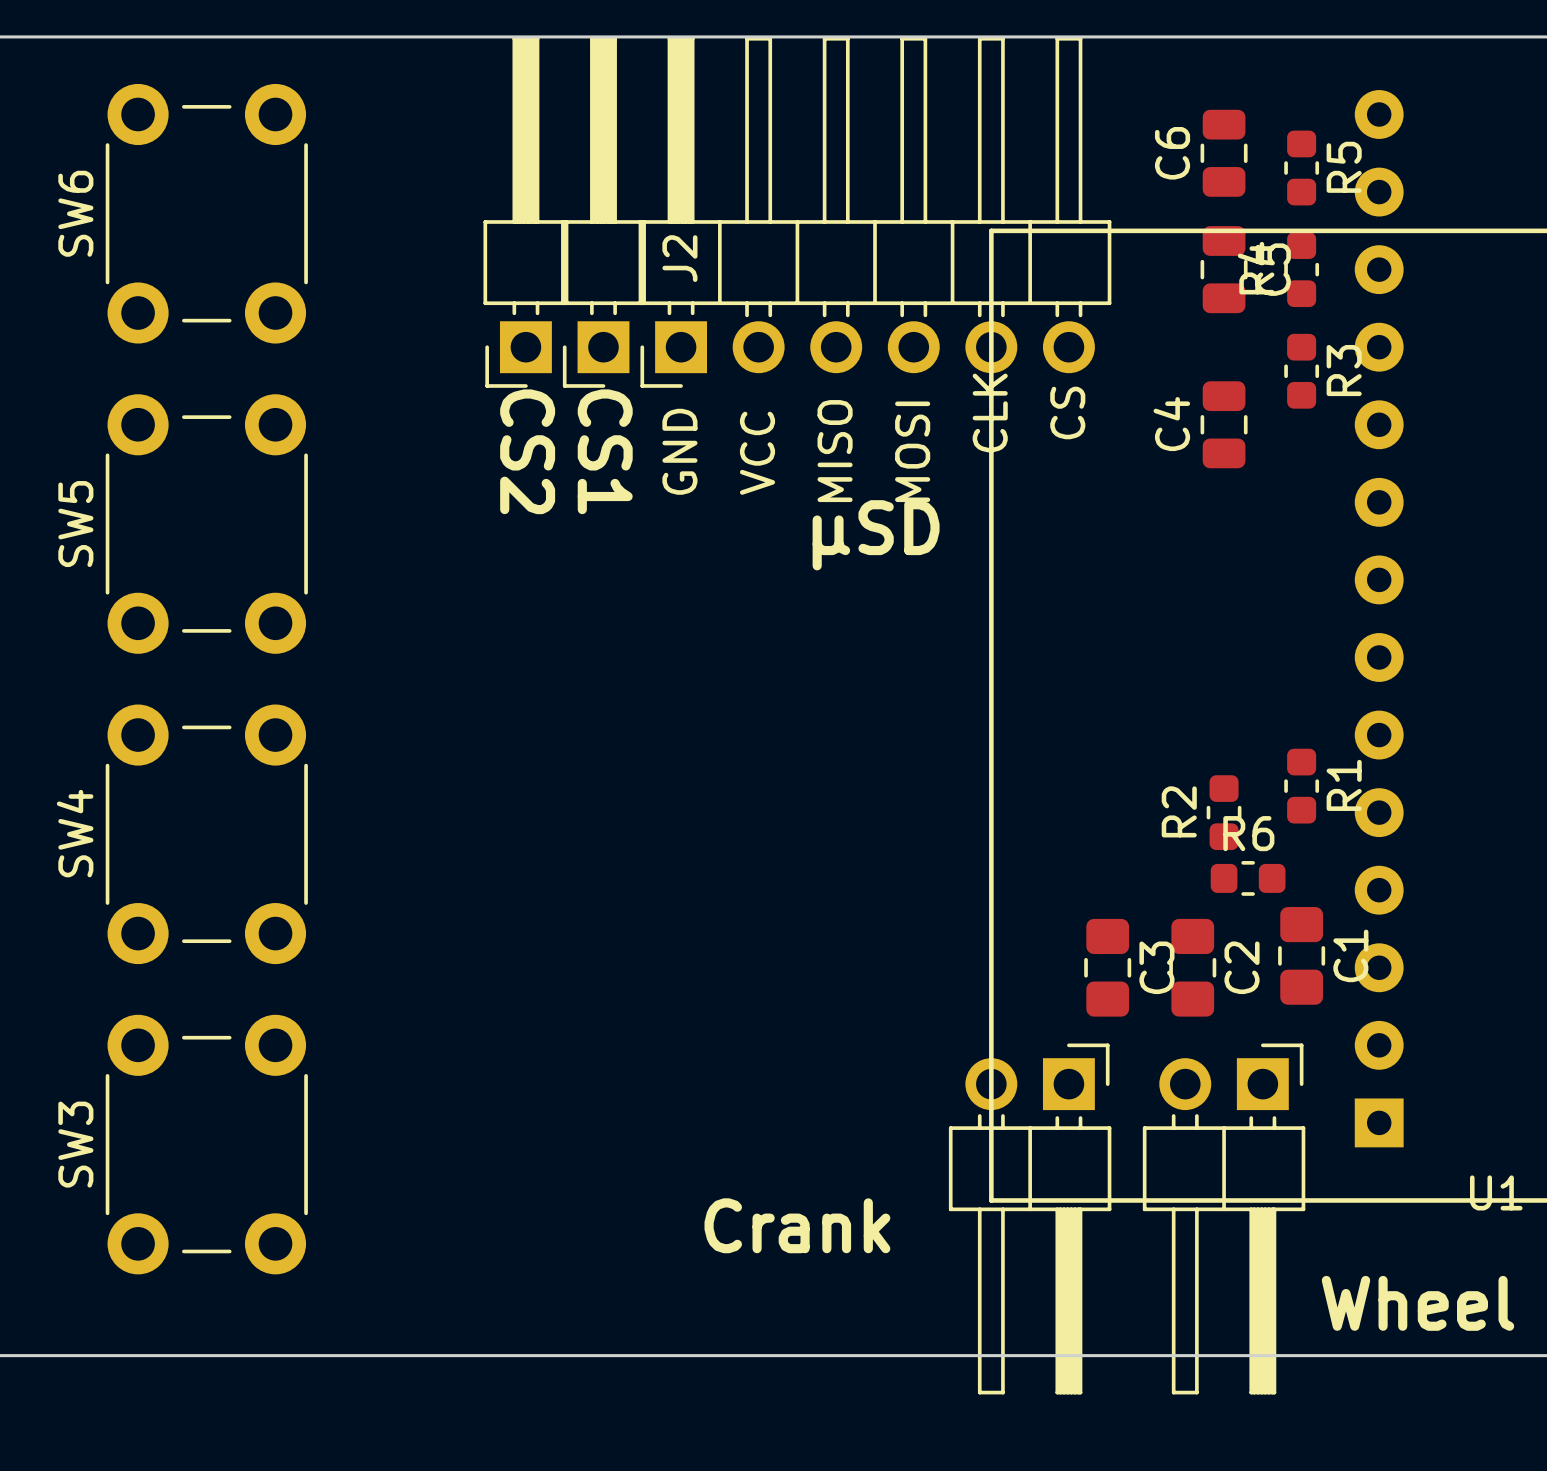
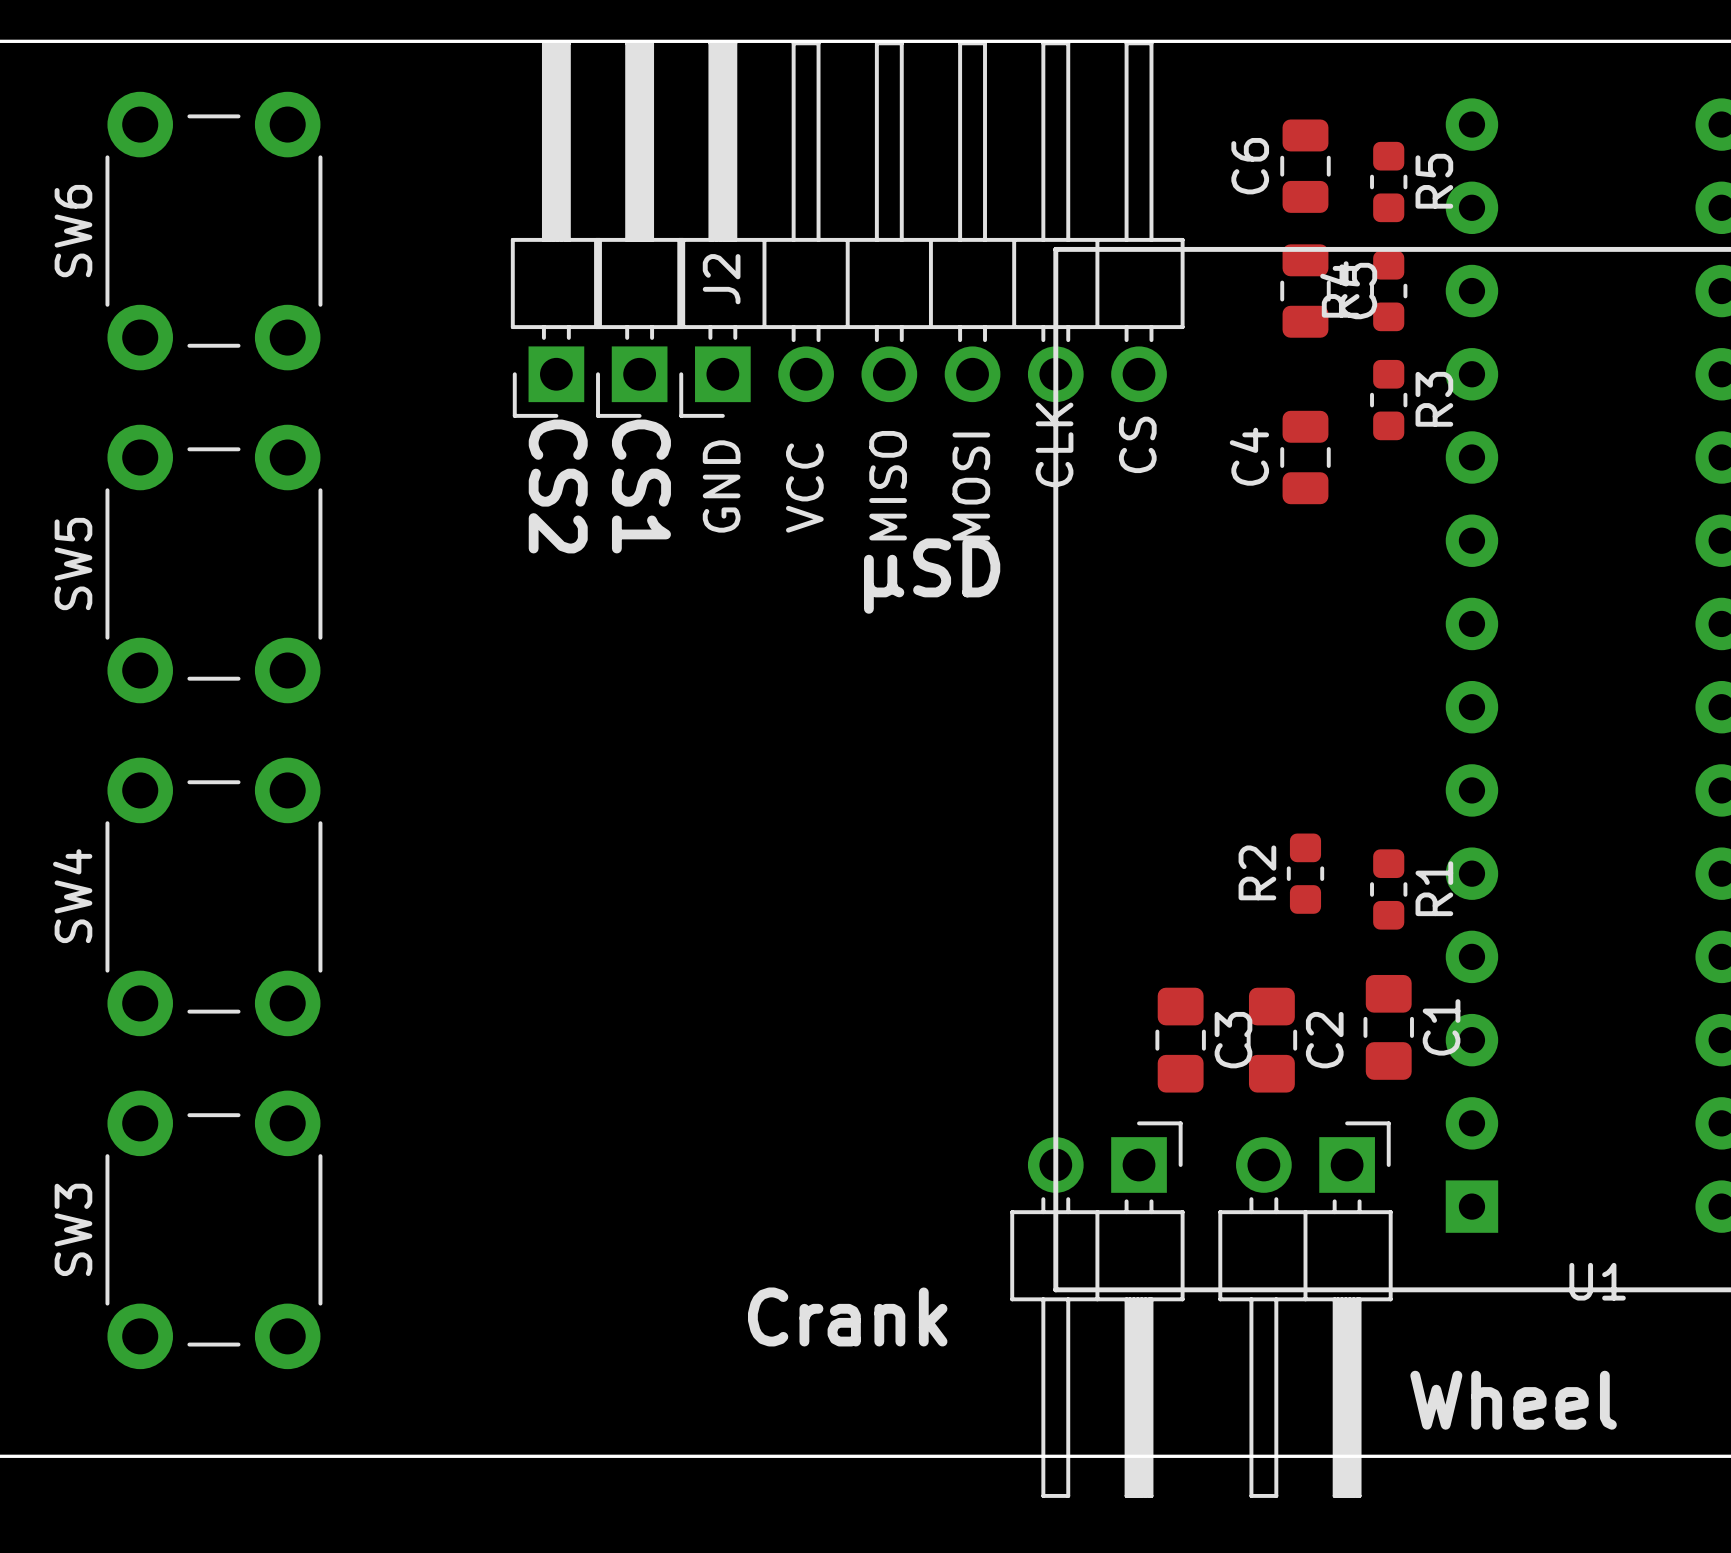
R1 position: (1301, 786) -> (1388, 889)
R6: (1248, 878) -> none

